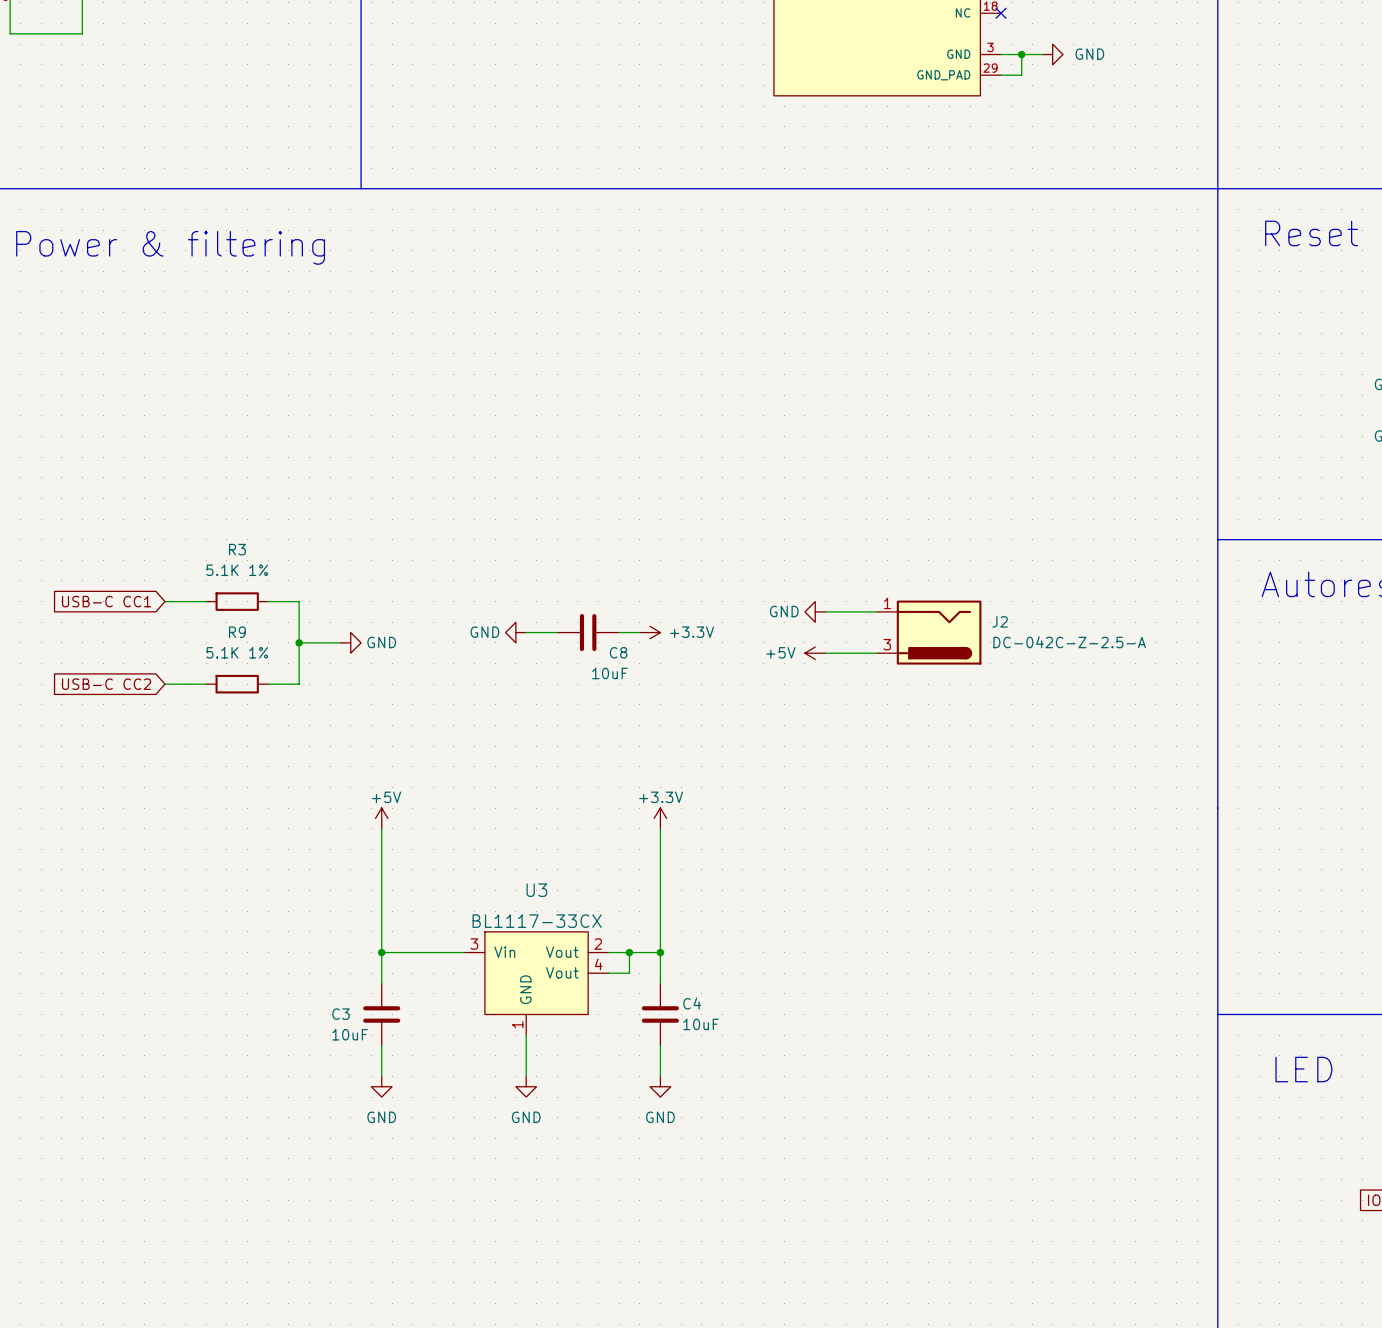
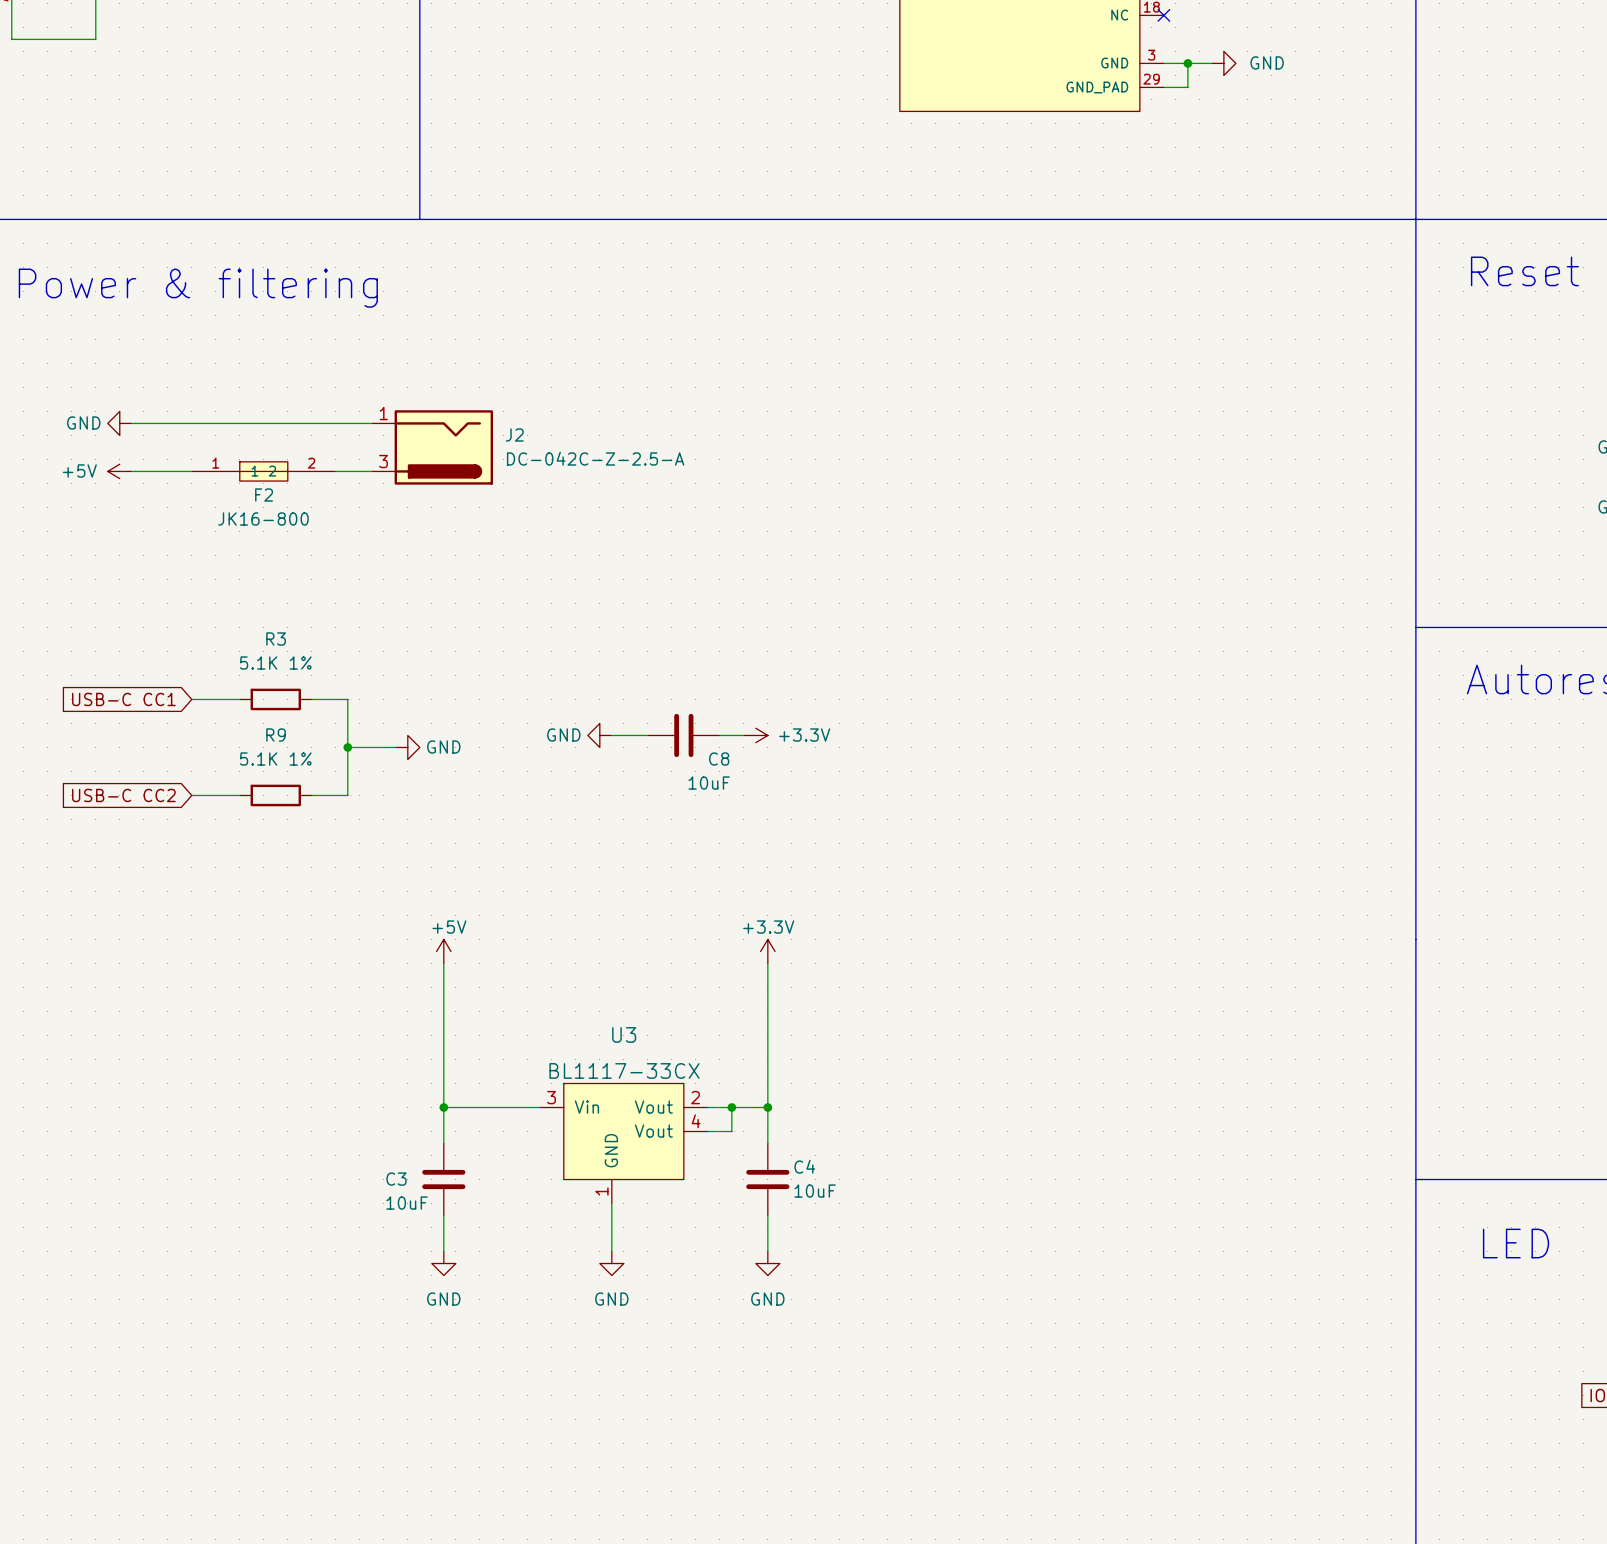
power symbol: none -> GND (119, 423)
wire: none -> (131, 423) (371, 423)
power symbol: none -> +5V (119, 471)
wire: none -> (131, 471) (191, 471)
F2: none -> JK16-800 (263, 471)
wire: none -> (335, 471) (371, 471)
power symbol: GND (815, 611) -> none
wire: (825, 611) (877, 611) -> none
J2 position: (929, 632) -> (432, 447)
power symbol: +5V (815, 653) -> none
wire: (825, 653) (877, 653) -> none

